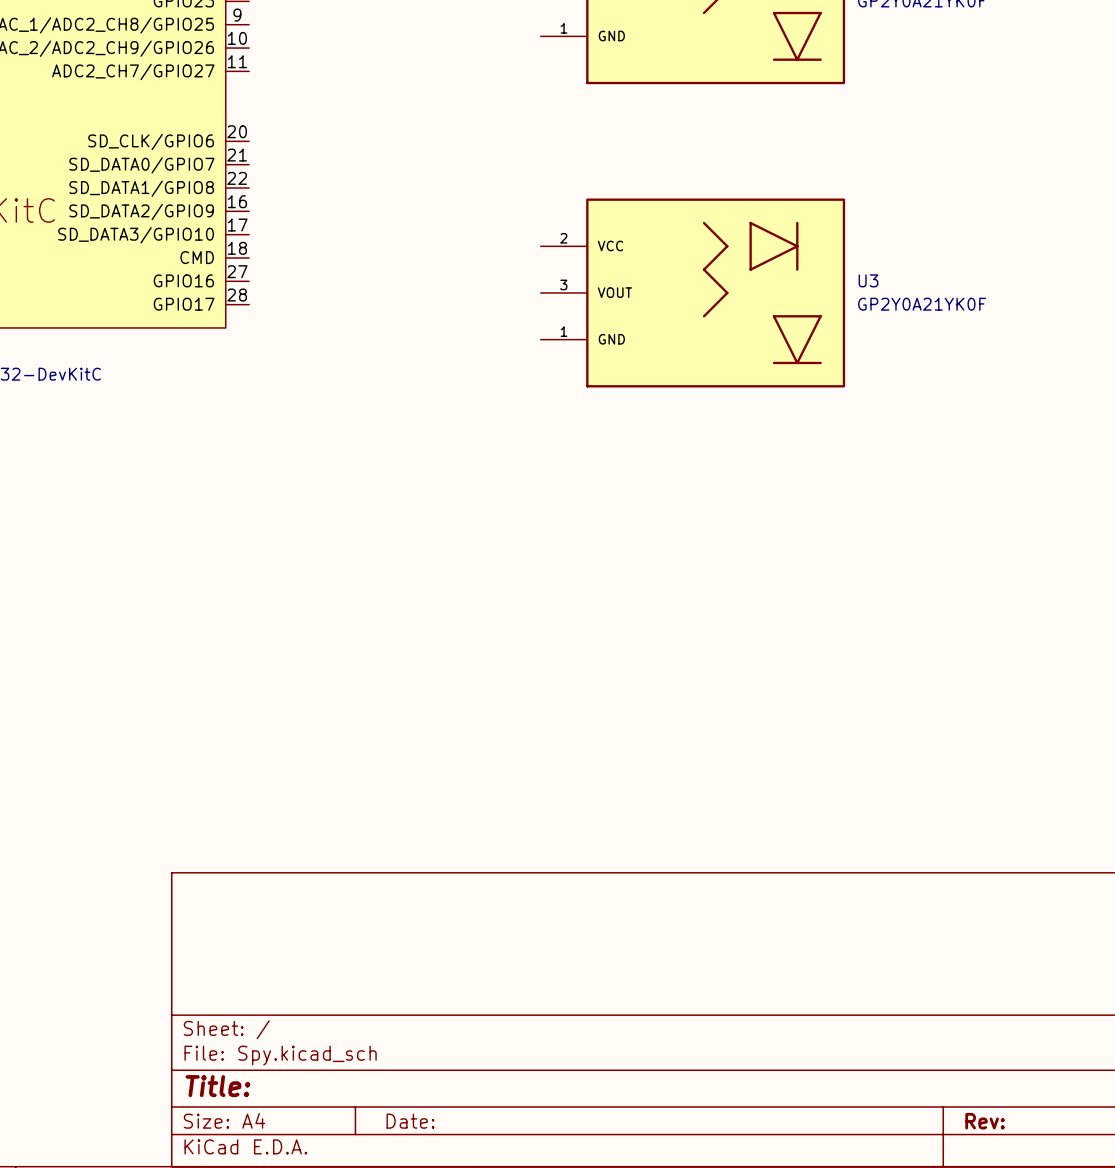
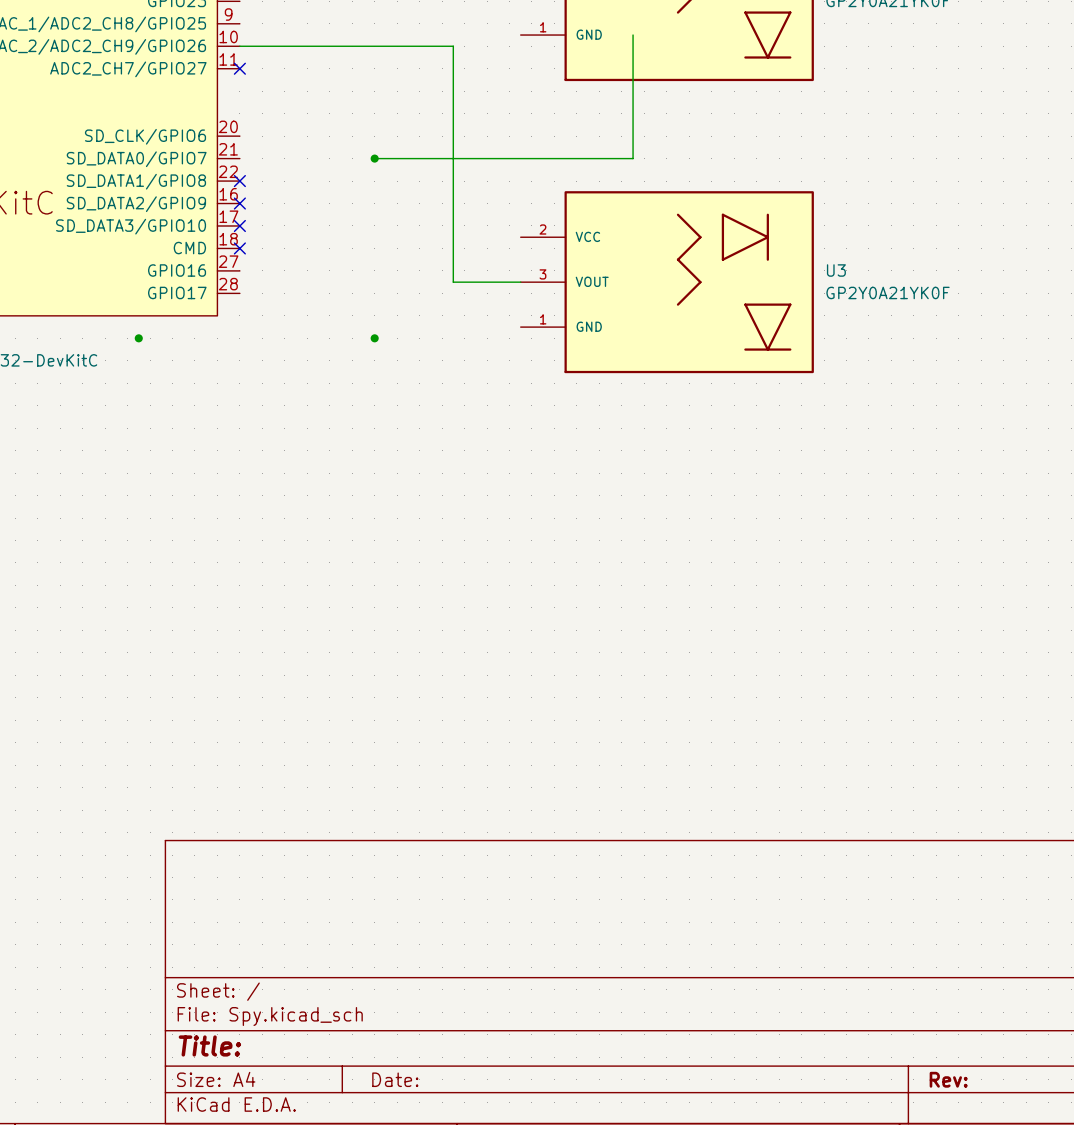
wire: none -> (633, 35) (633, 158) (374, 158)
wire: none -> (239, 46) (453, 46) (453, 282) (520, 282)
no-connect mark: none -> (239, 68)
junction: none -> (374, 158)
no-connect mark: none -> (239, 181)
no-connect mark: none -> (239, 203)
no-connect mark: none -> (239, 225)
no-connect mark: none -> (239, 248)
junction: none -> (138, 338)
junction: none -> (374, 338)

